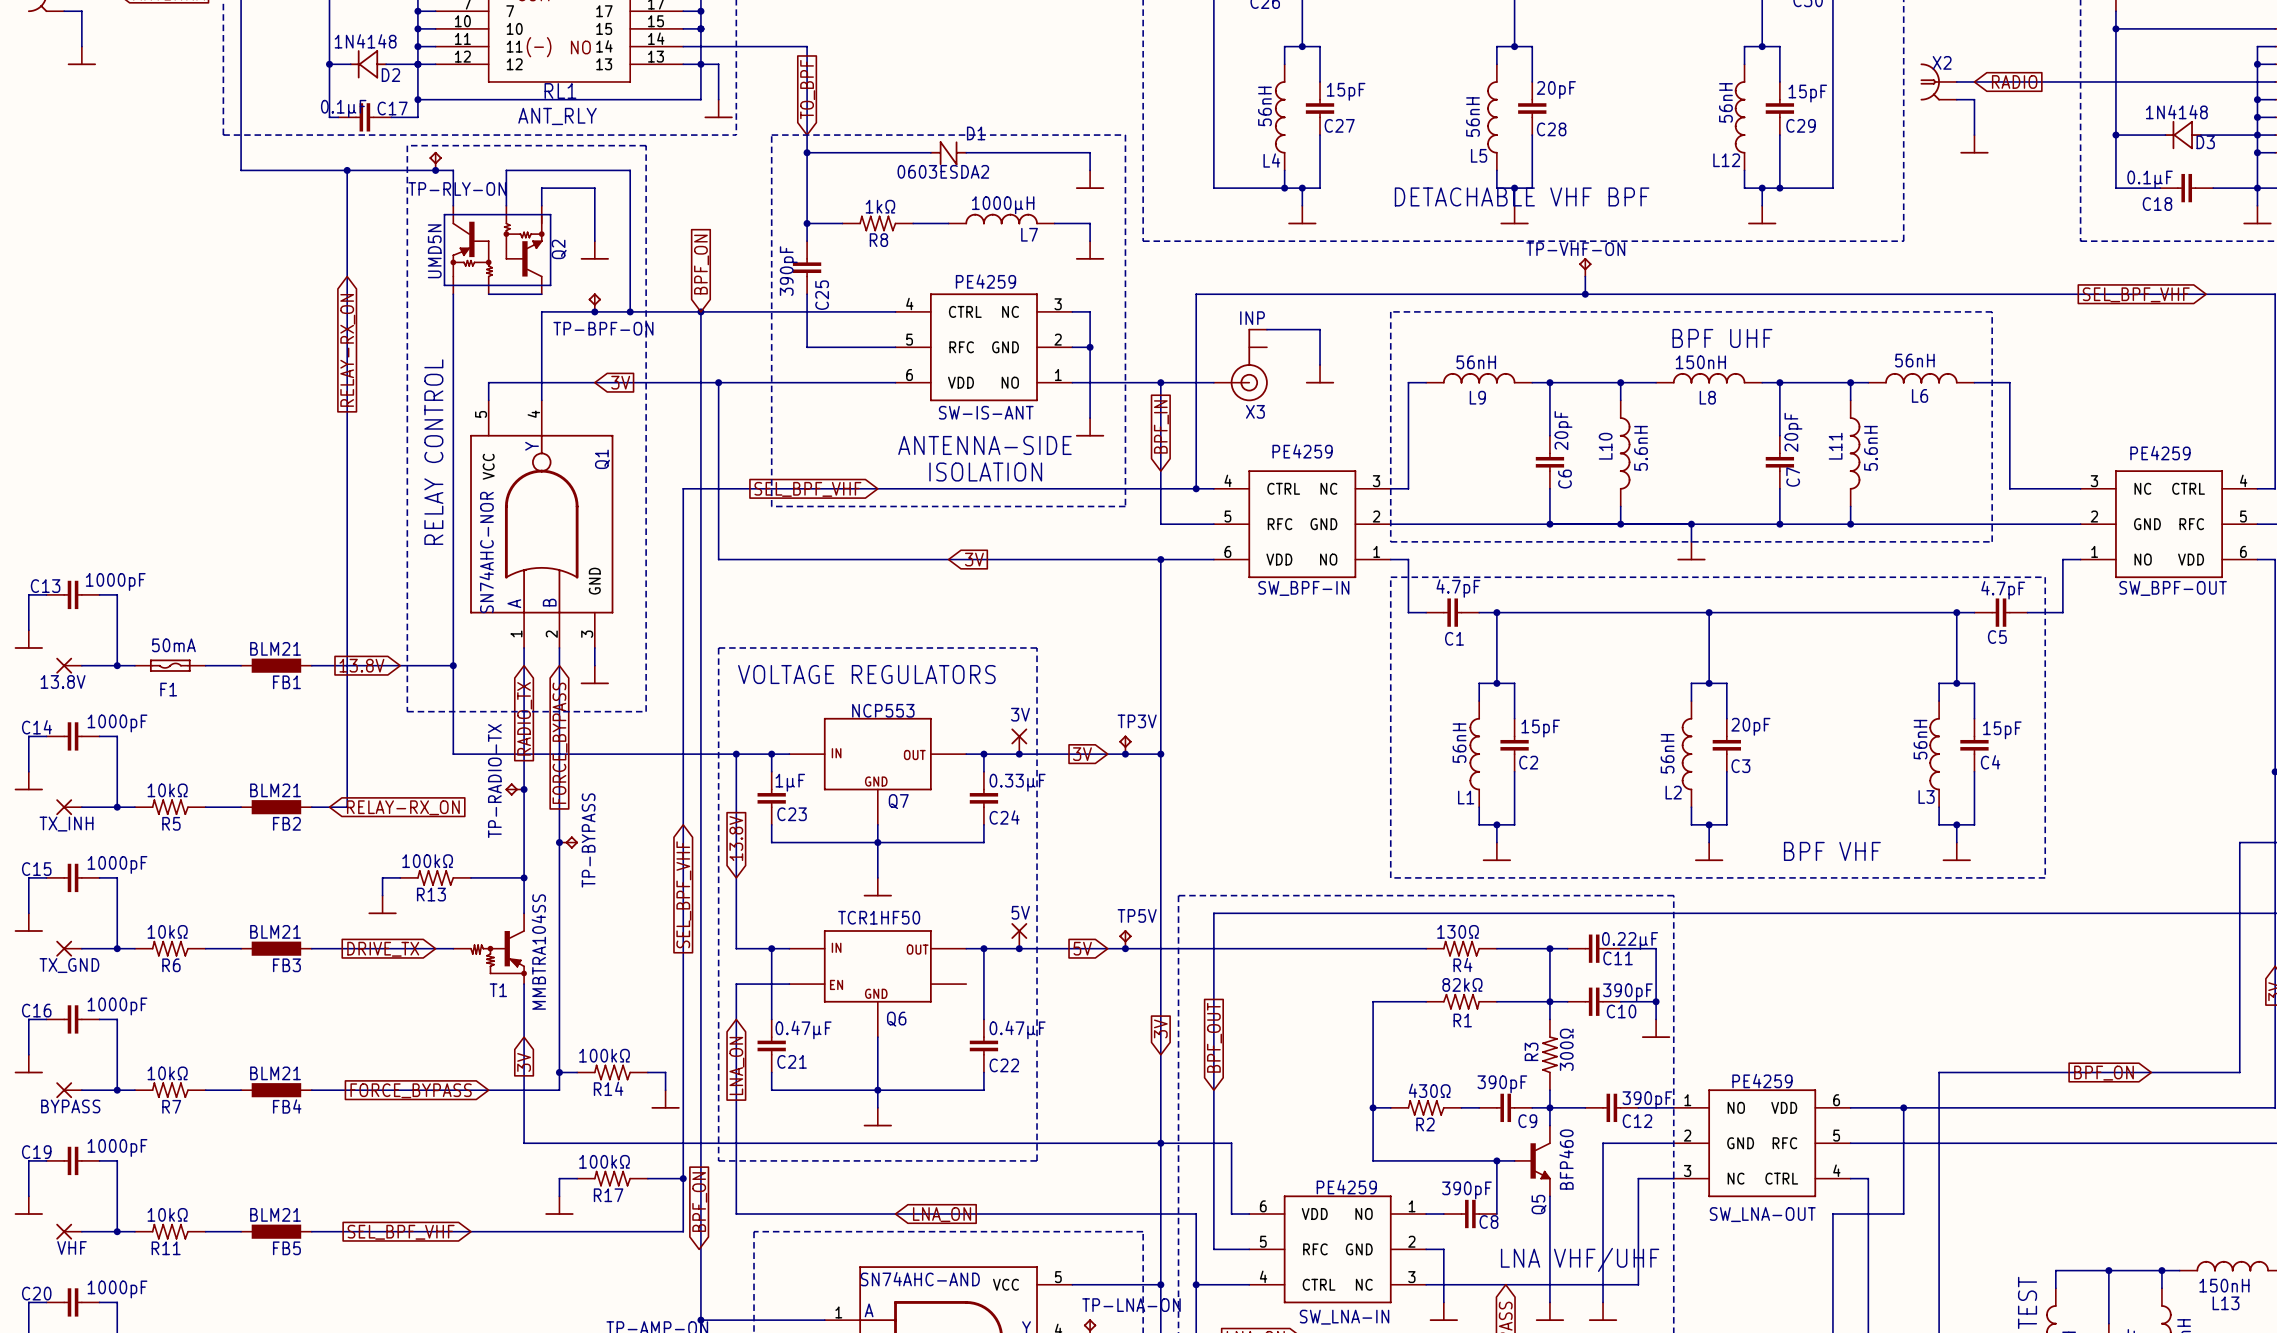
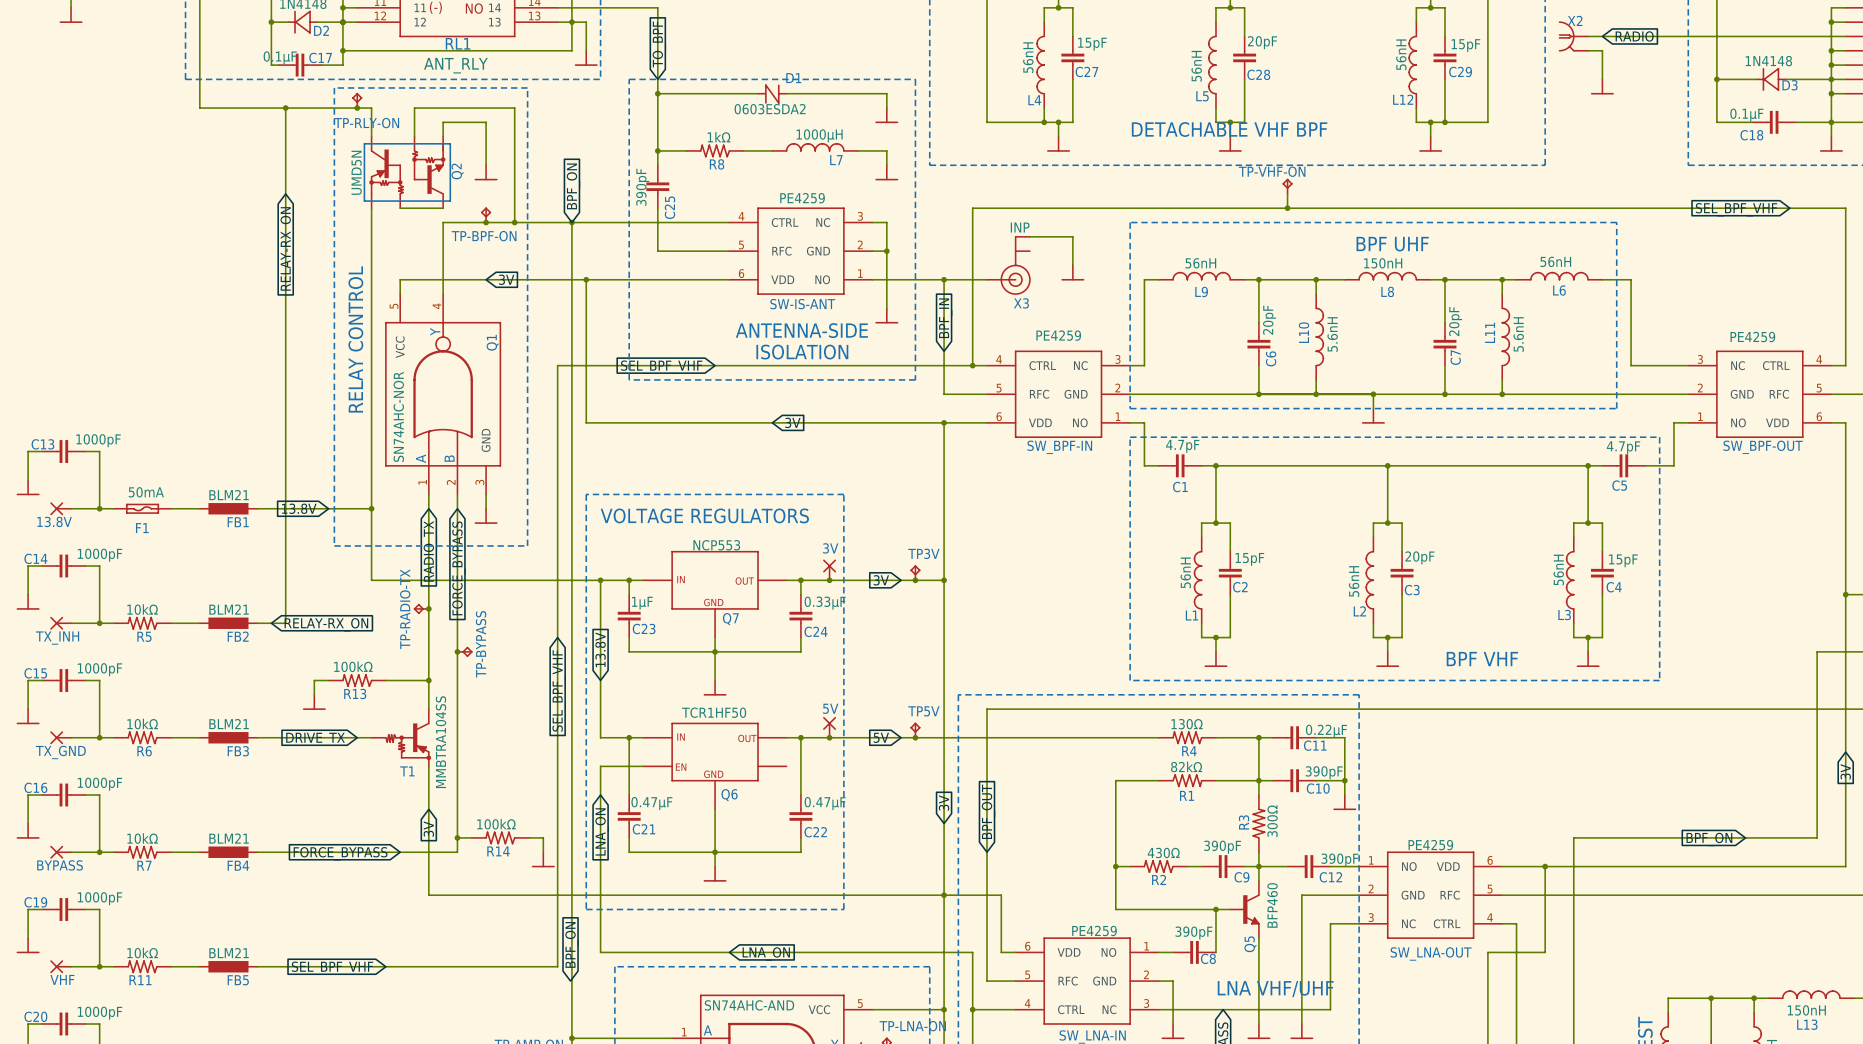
wire: (577, 1178) (559, 1178) (559, 1196) -> none
R17: 100kΩ (612, 1178) -> none
wire: (647, 1178) (683, 1178) -> none
junction: (683, 1178) -> none
power symbol: (559, 1205) -> none

